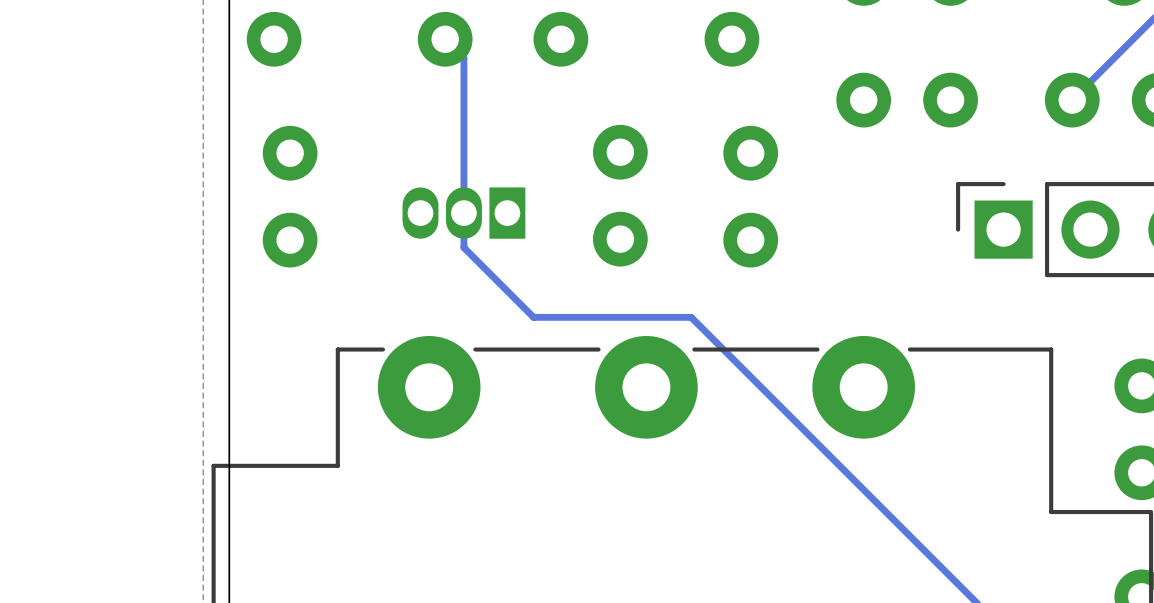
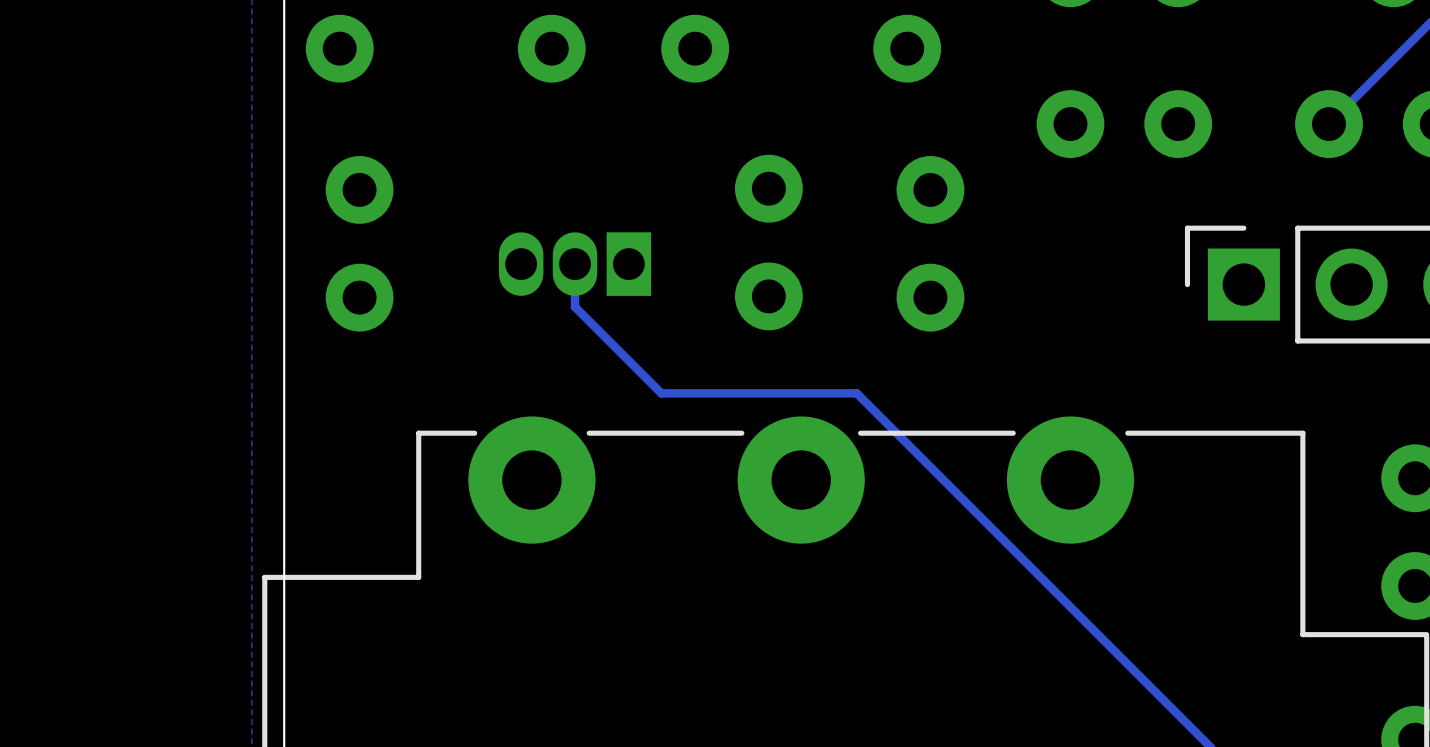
track: (445, 39) (463, 58) (463, 213) -> none

